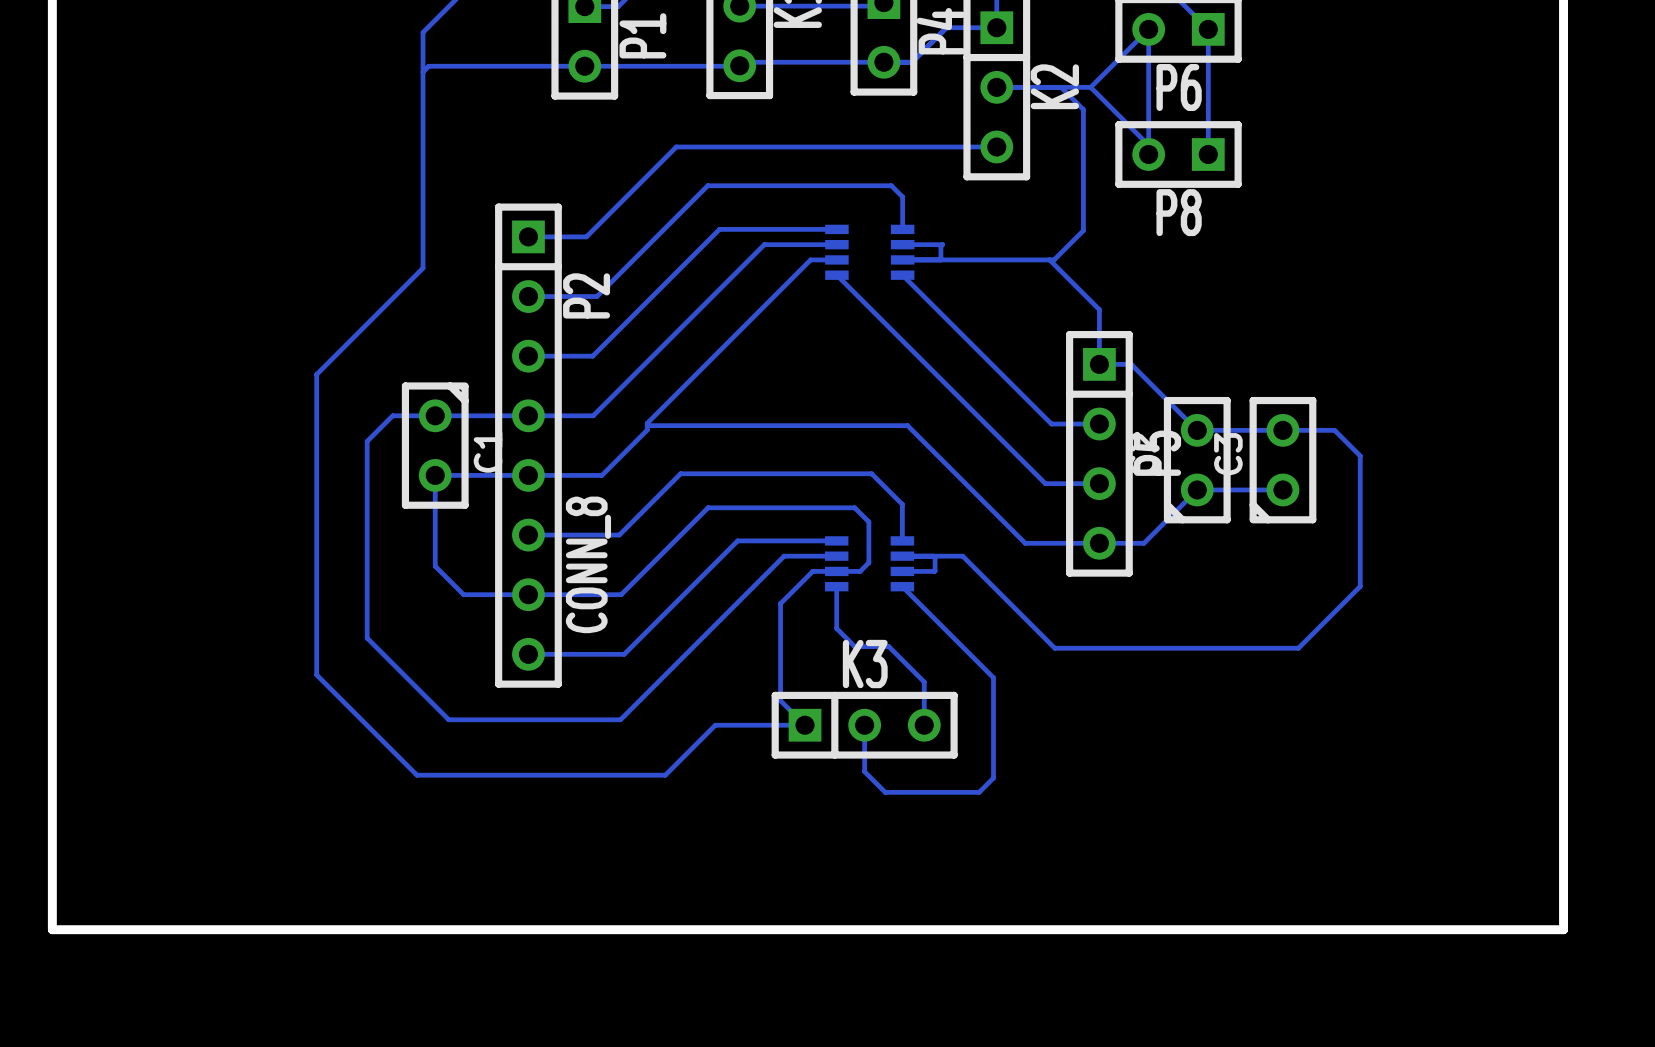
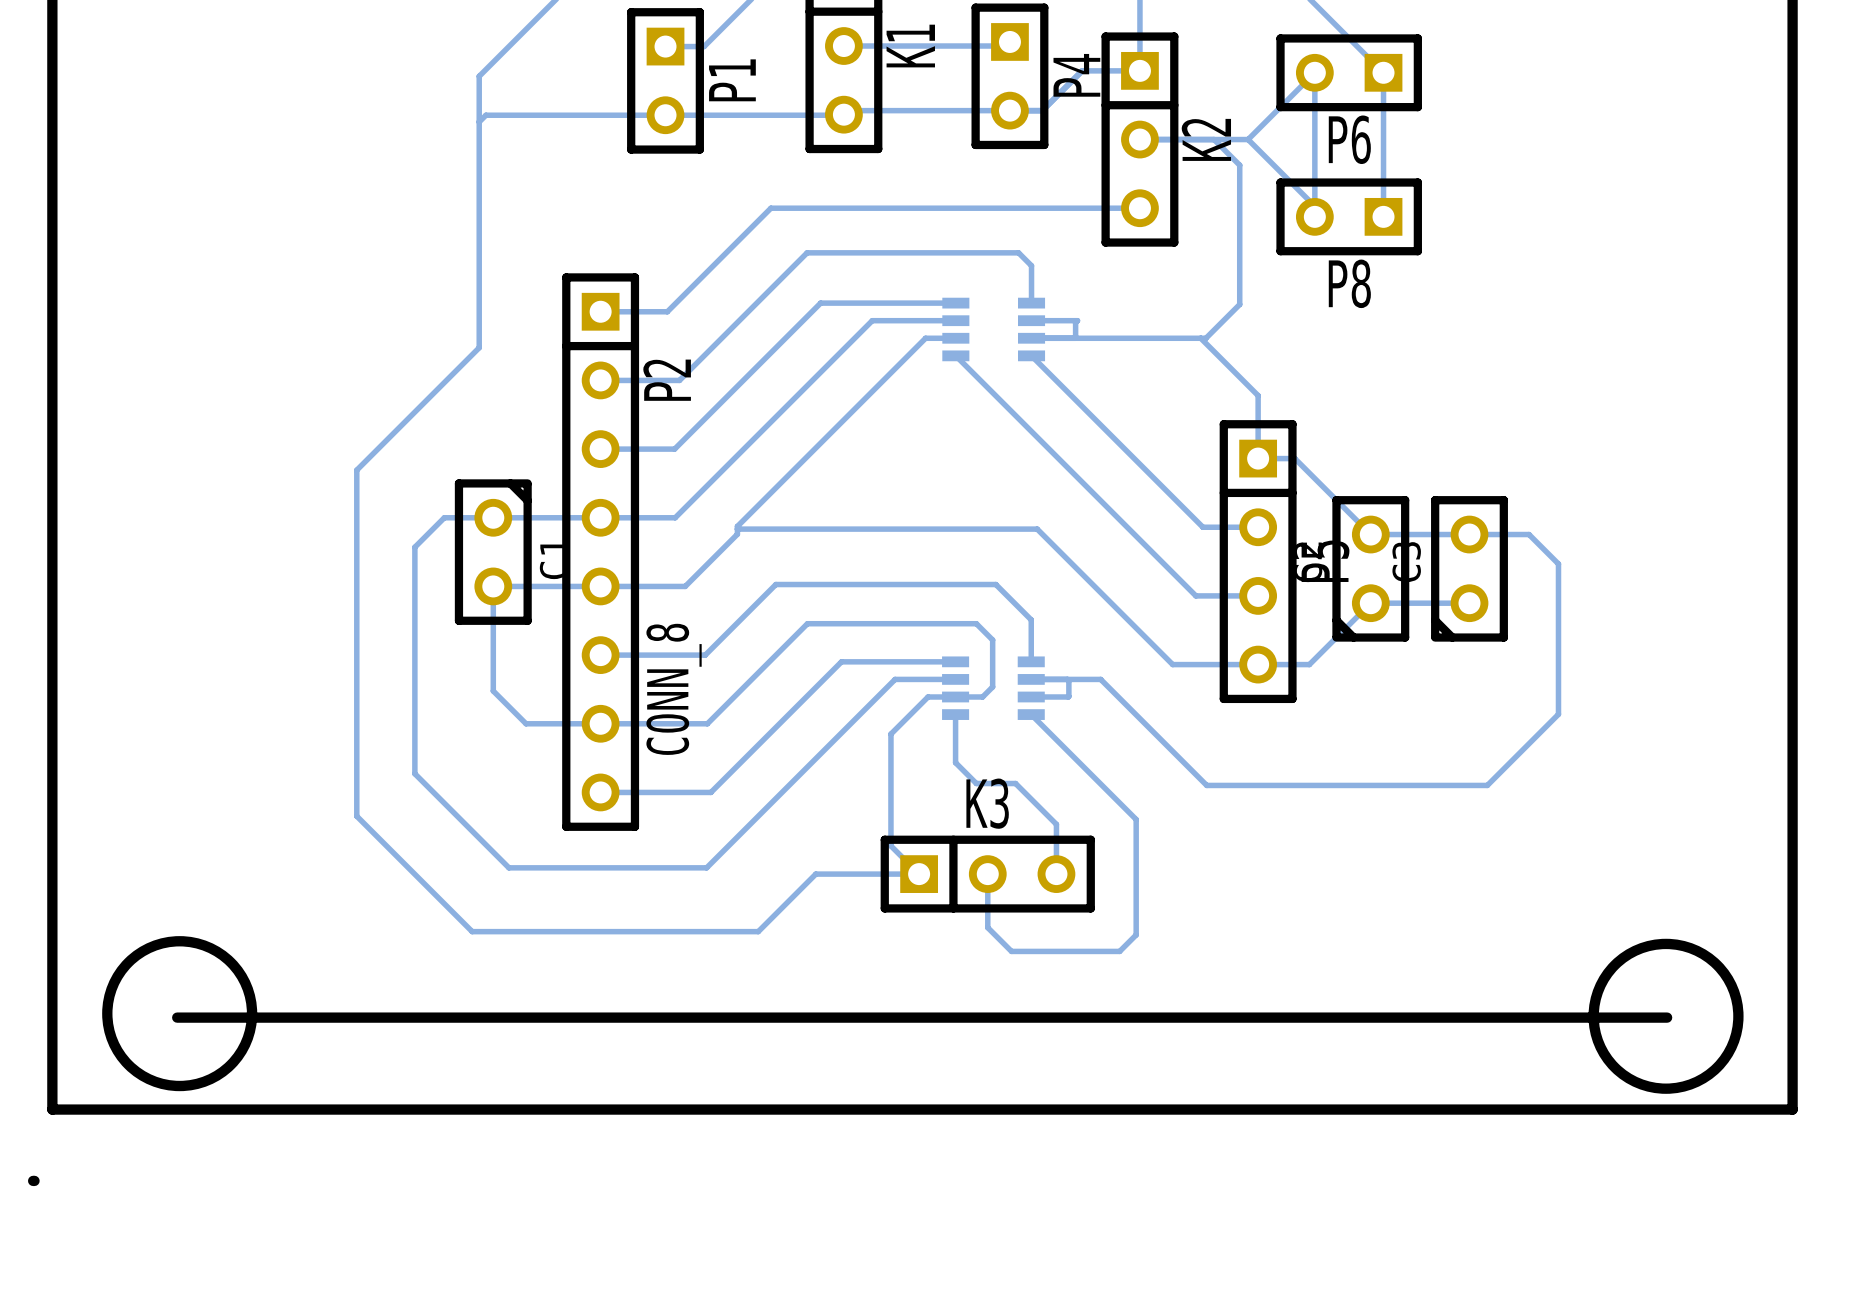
round board edge: none -> [102, 936, 258, 1092]
round board edge: none -> [1588, 938, 1744, 1094]
board edge: none -> (177, 1017) (1667, 1017)
board edge: none -> (33, 1180) (34, 1180)

